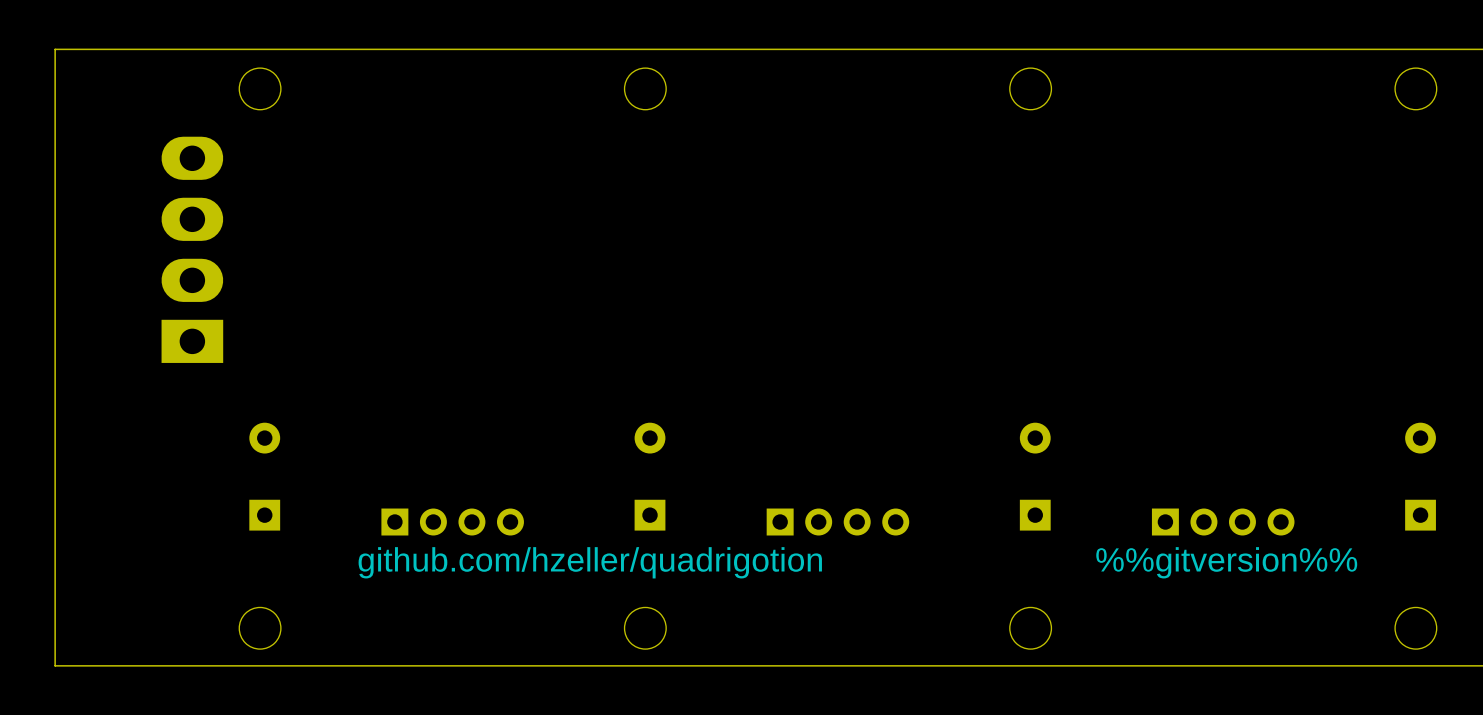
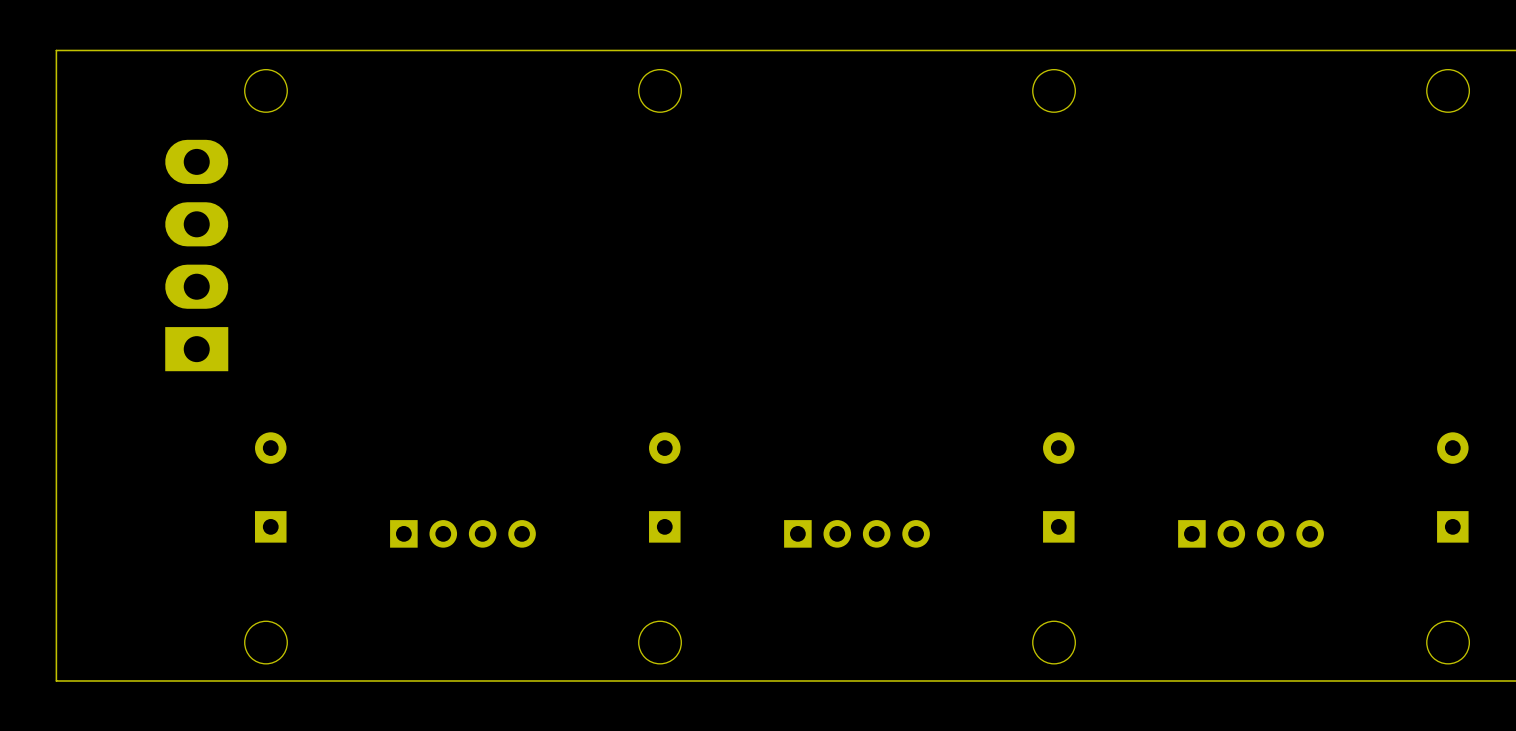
text: github.com/hzeller/quadrigotion (590, 562) -> none
text: %%gitversion%% (1226, 562) -> none

